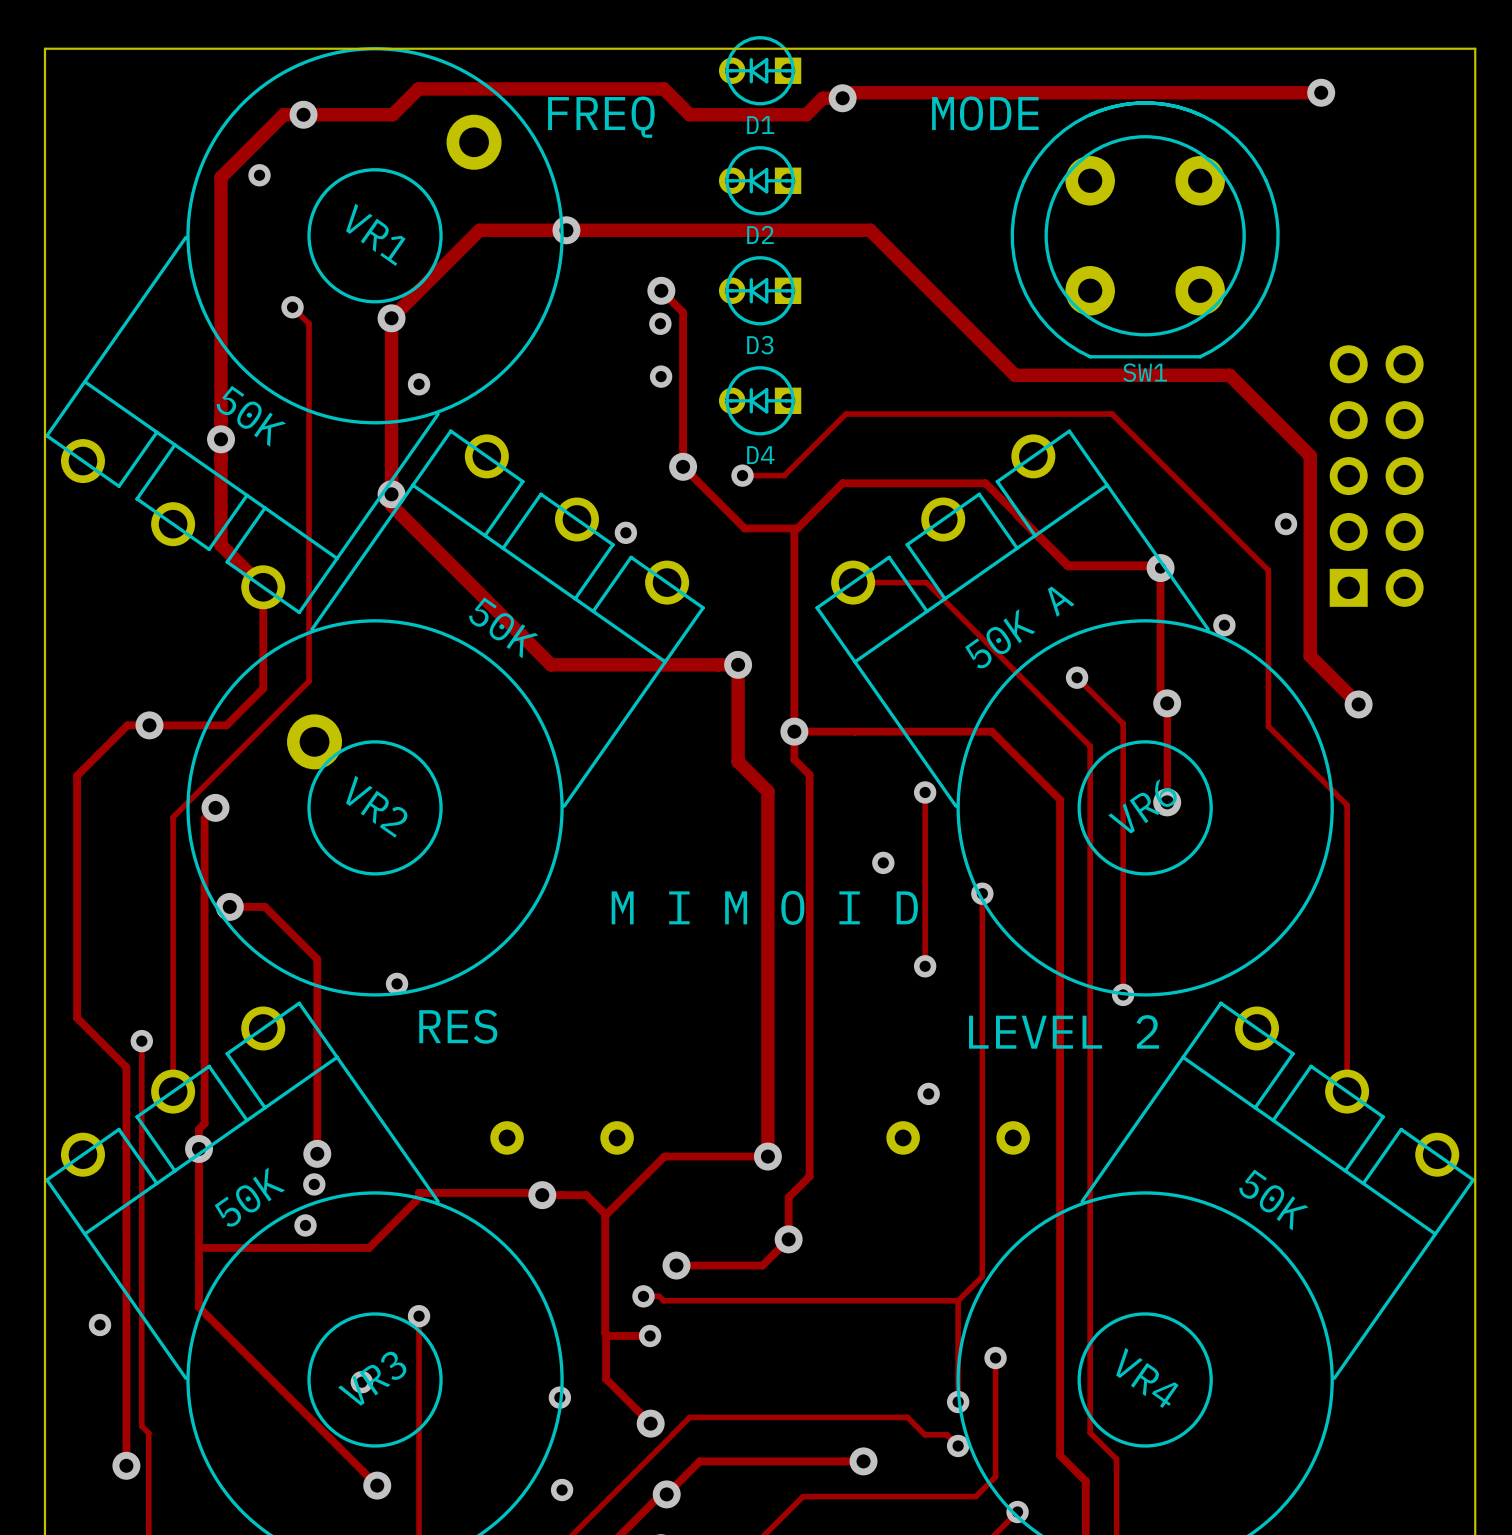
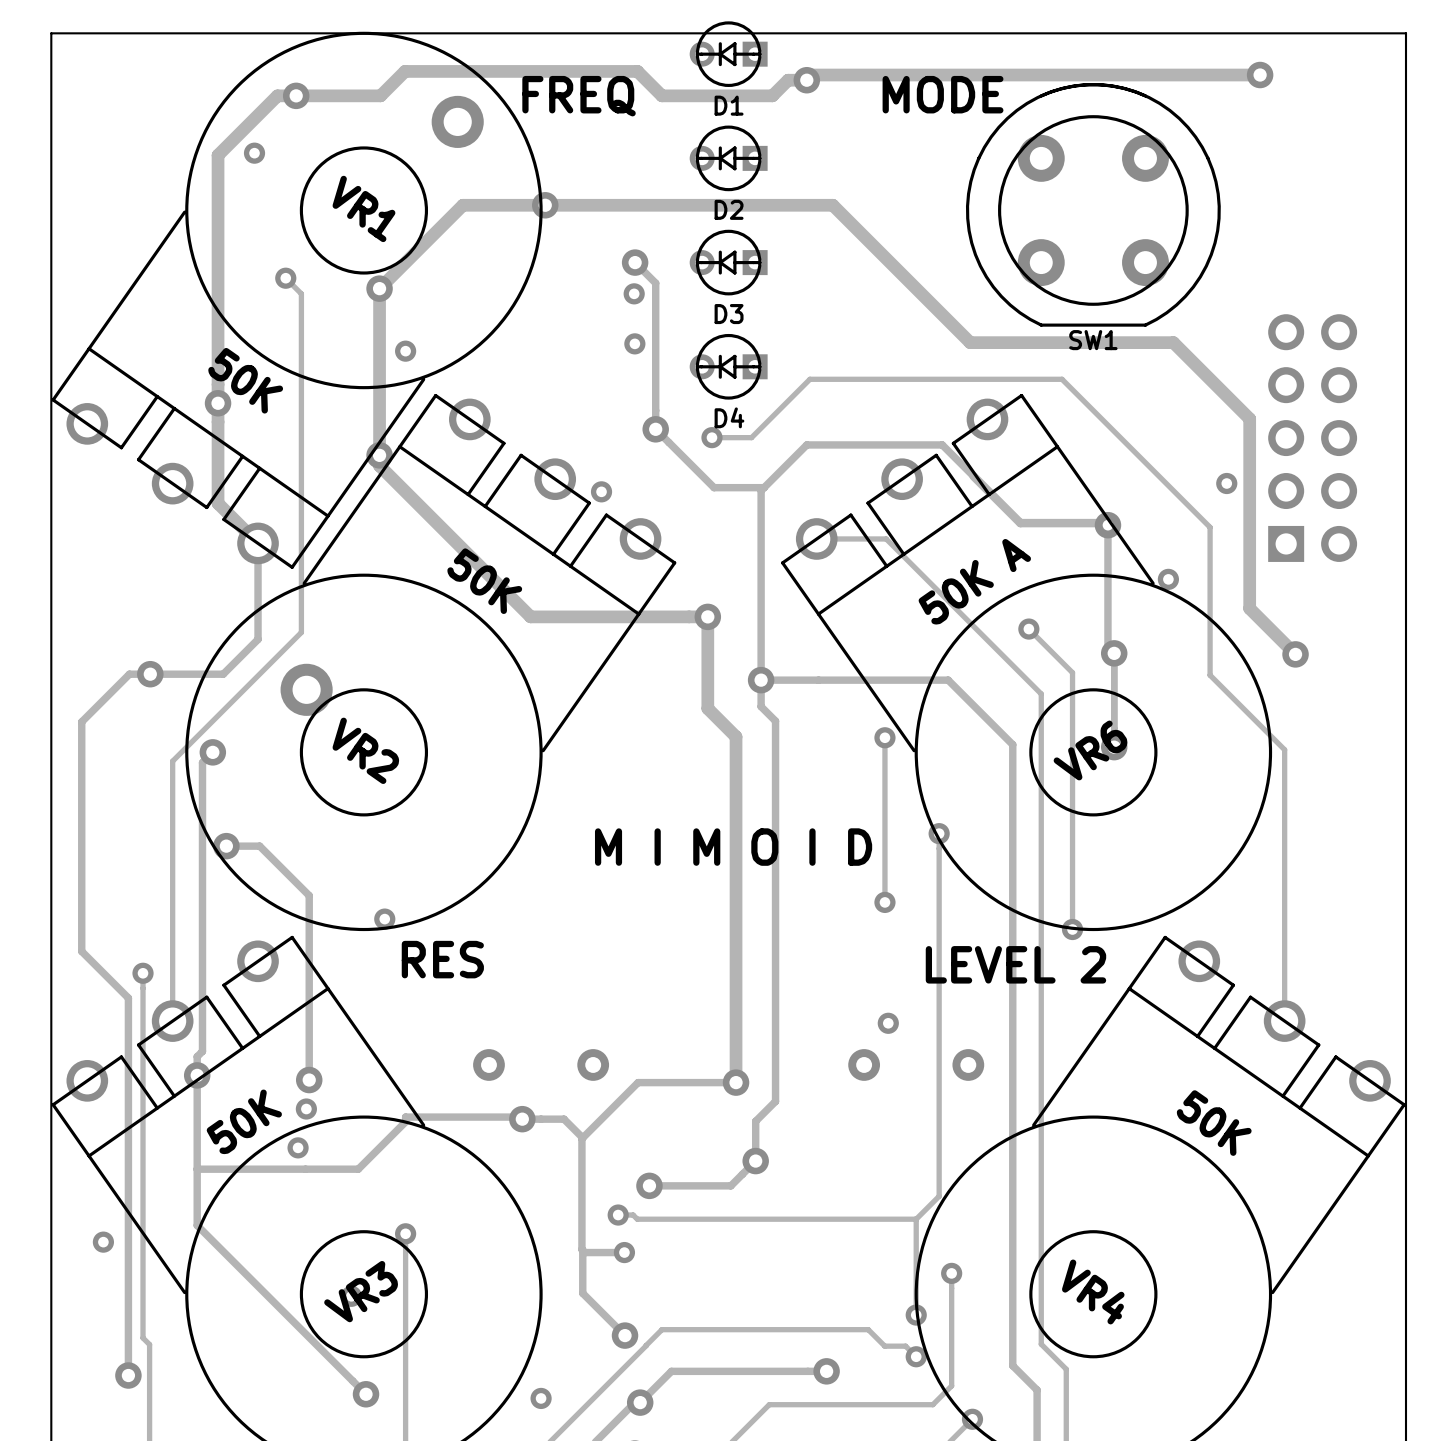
via: (883, 862) -> none
via: (559, 1397) -> none

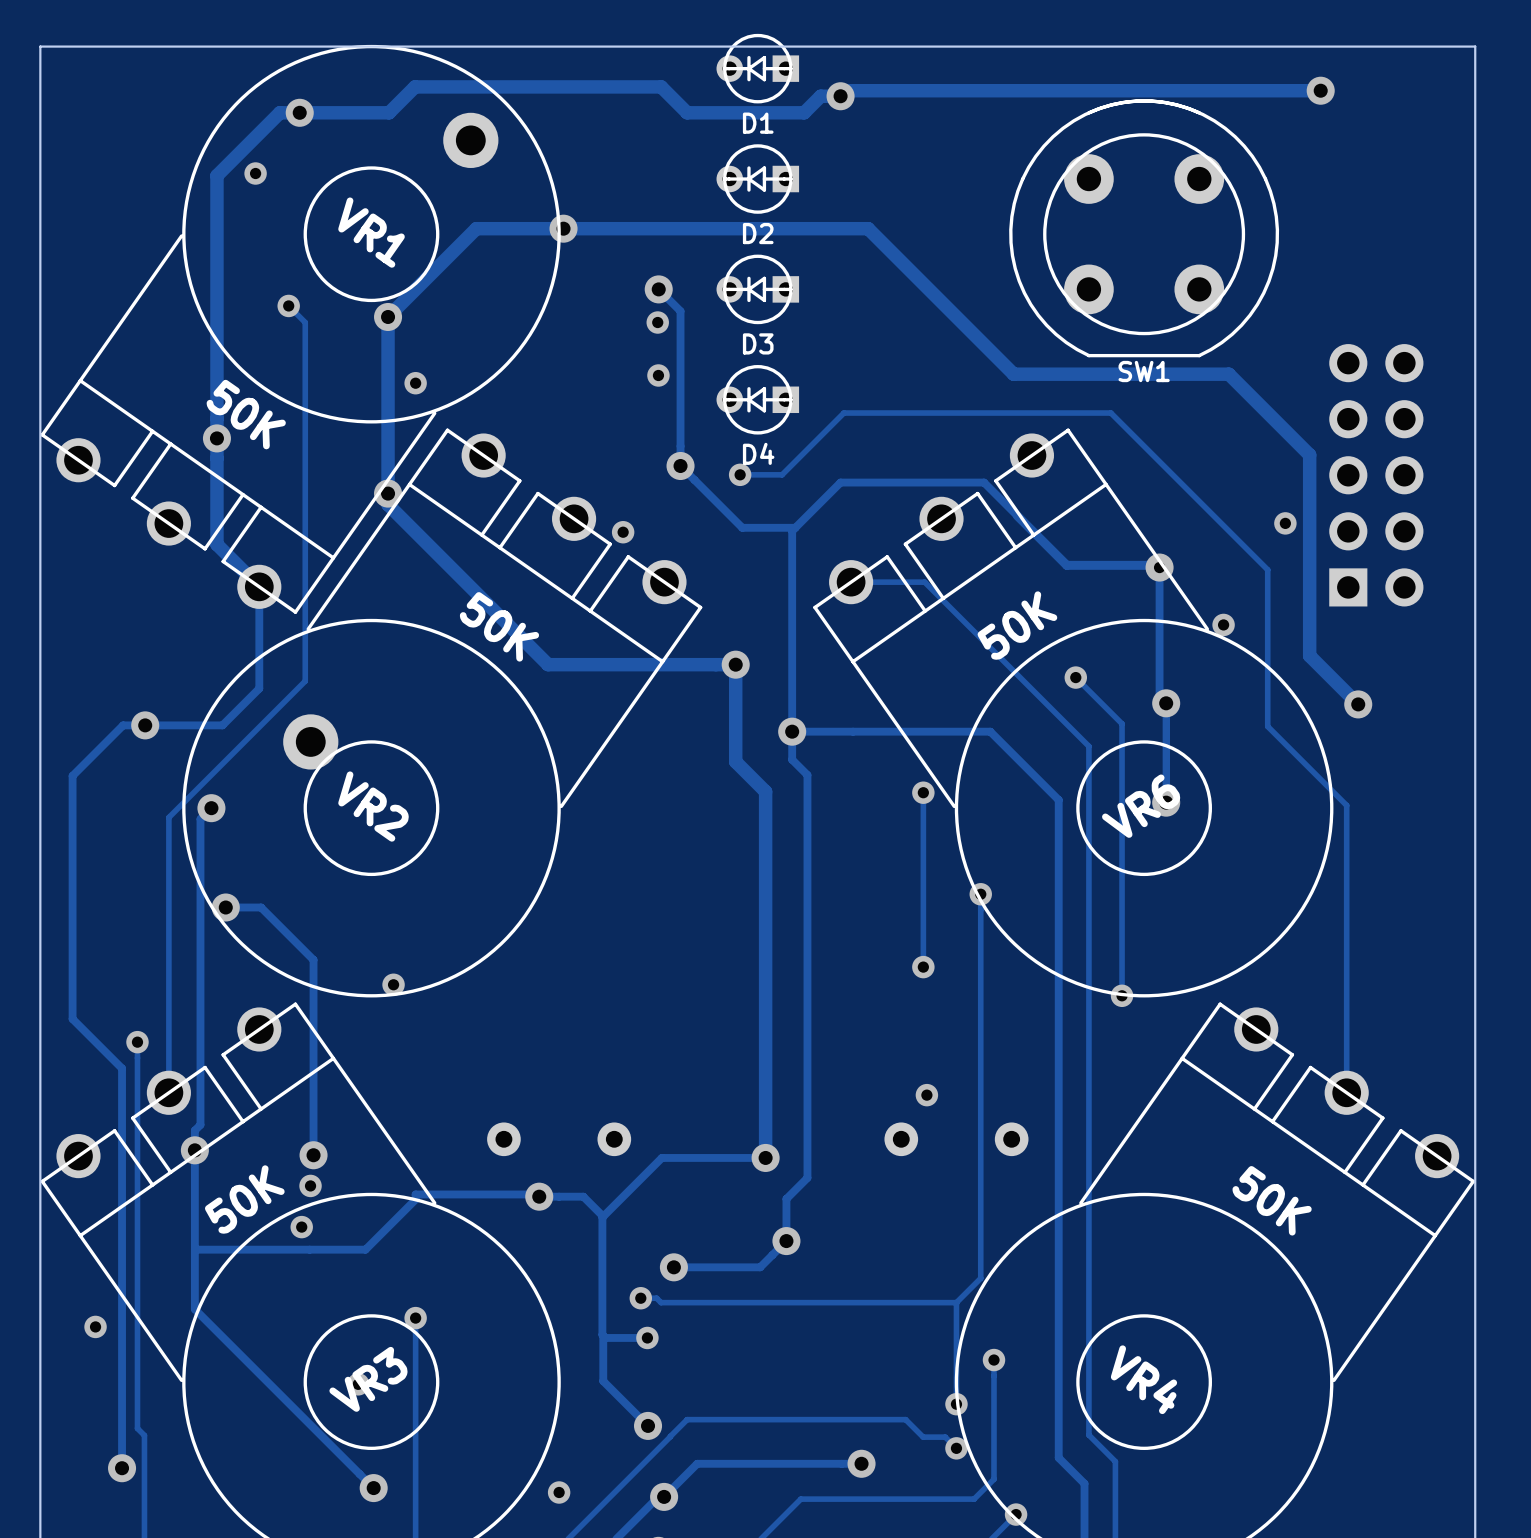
text: MODE (943, 94) -> none
text: FREQ (579, 96) -> none
VR6 value: 50K A (974, 581) -> 50K (1017, 625)
text: M I M O I D (733, 847) -> none
text: RES (442, 959) -> none
text: LEVEL 2 (1015, 964) -> none

